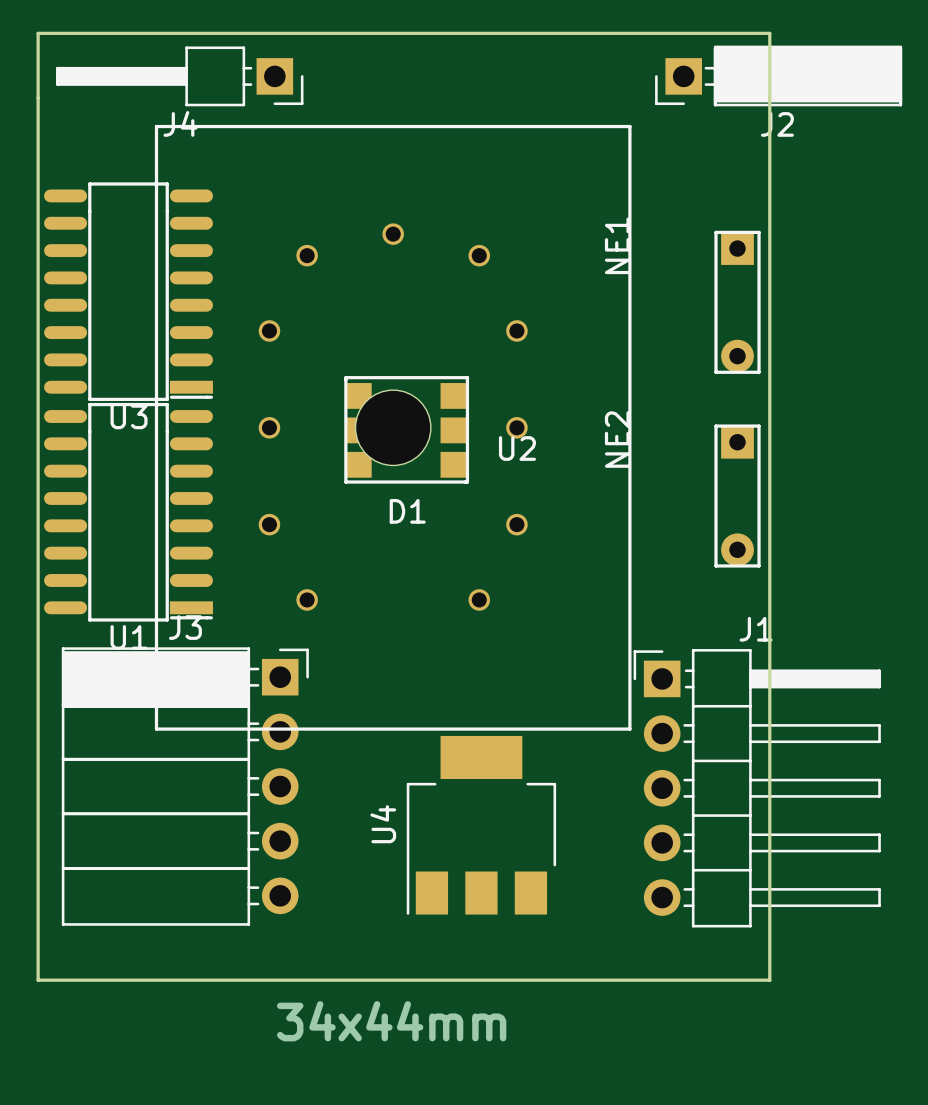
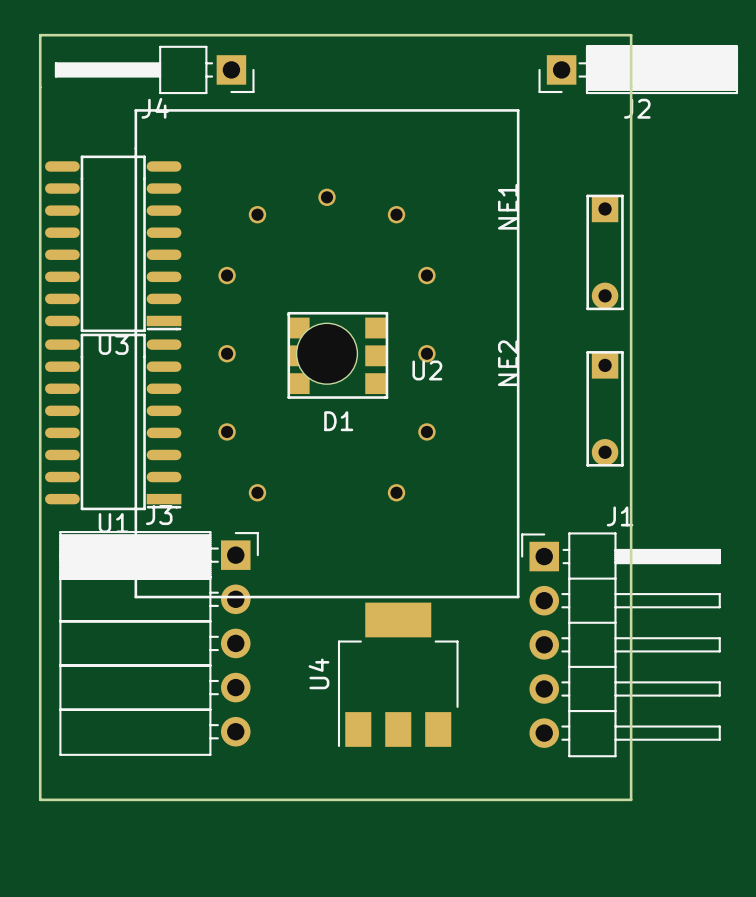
text: 34x44mm (391, 1021) -> none

